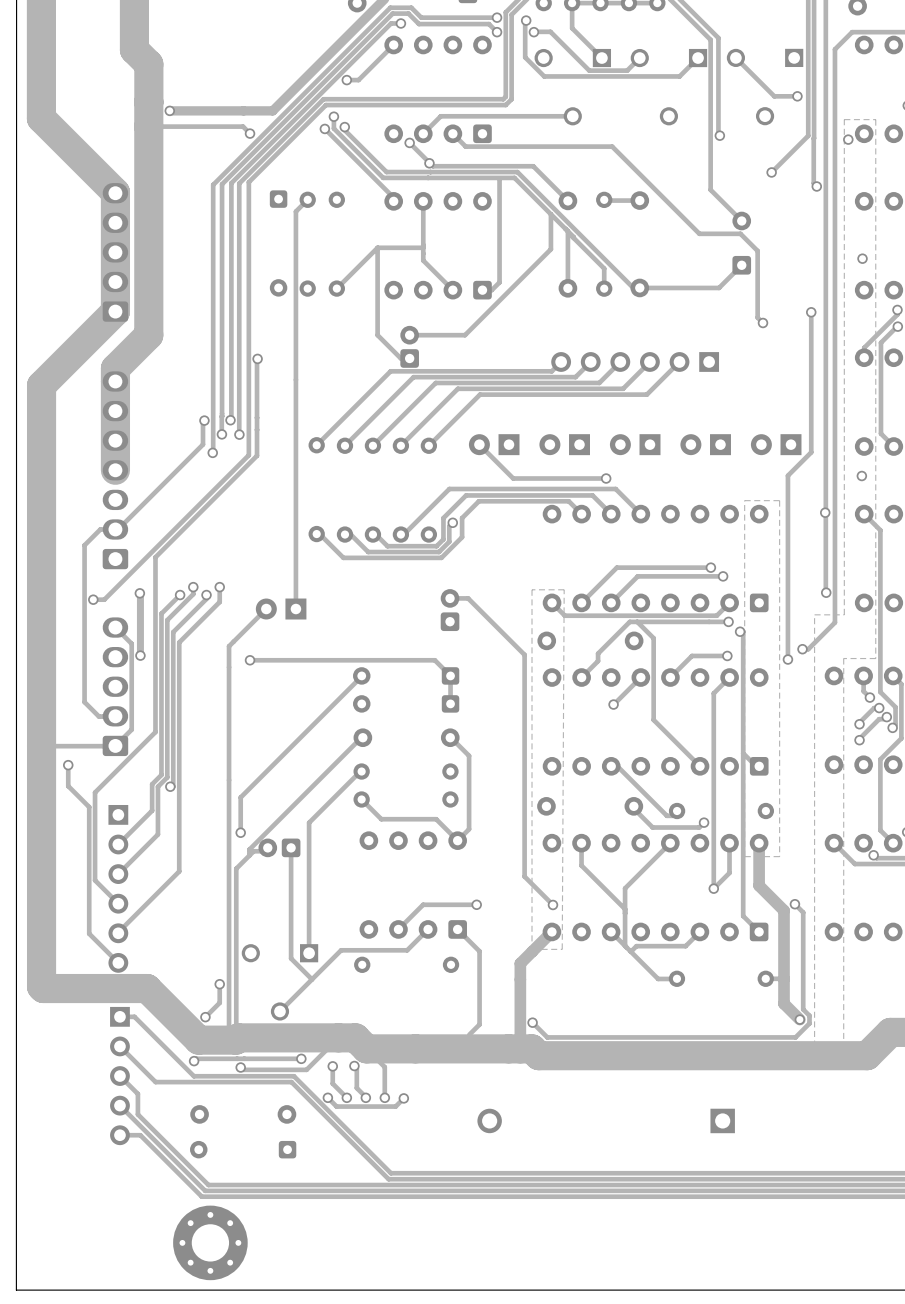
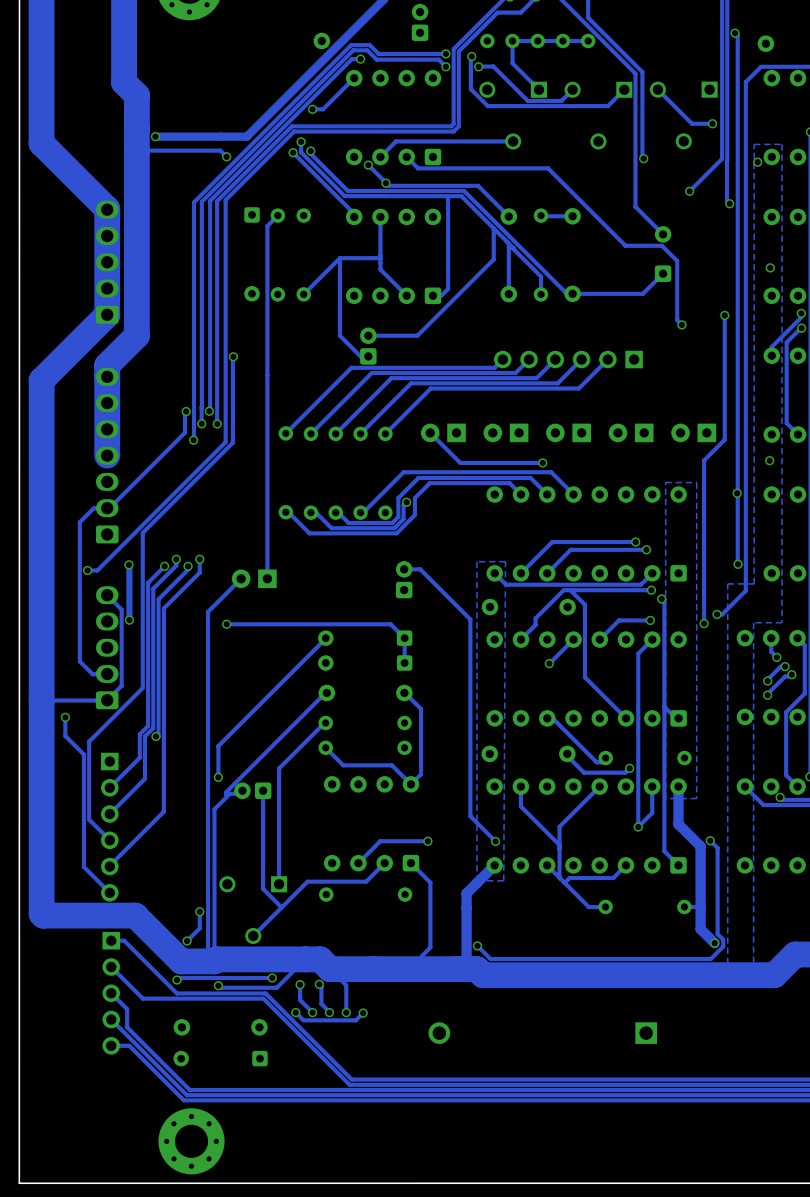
track: (864, 514) (880, 530) (880, 692) (895, 707) (895, 724) (892, 727) -> none
via: (892, 727) -> none

